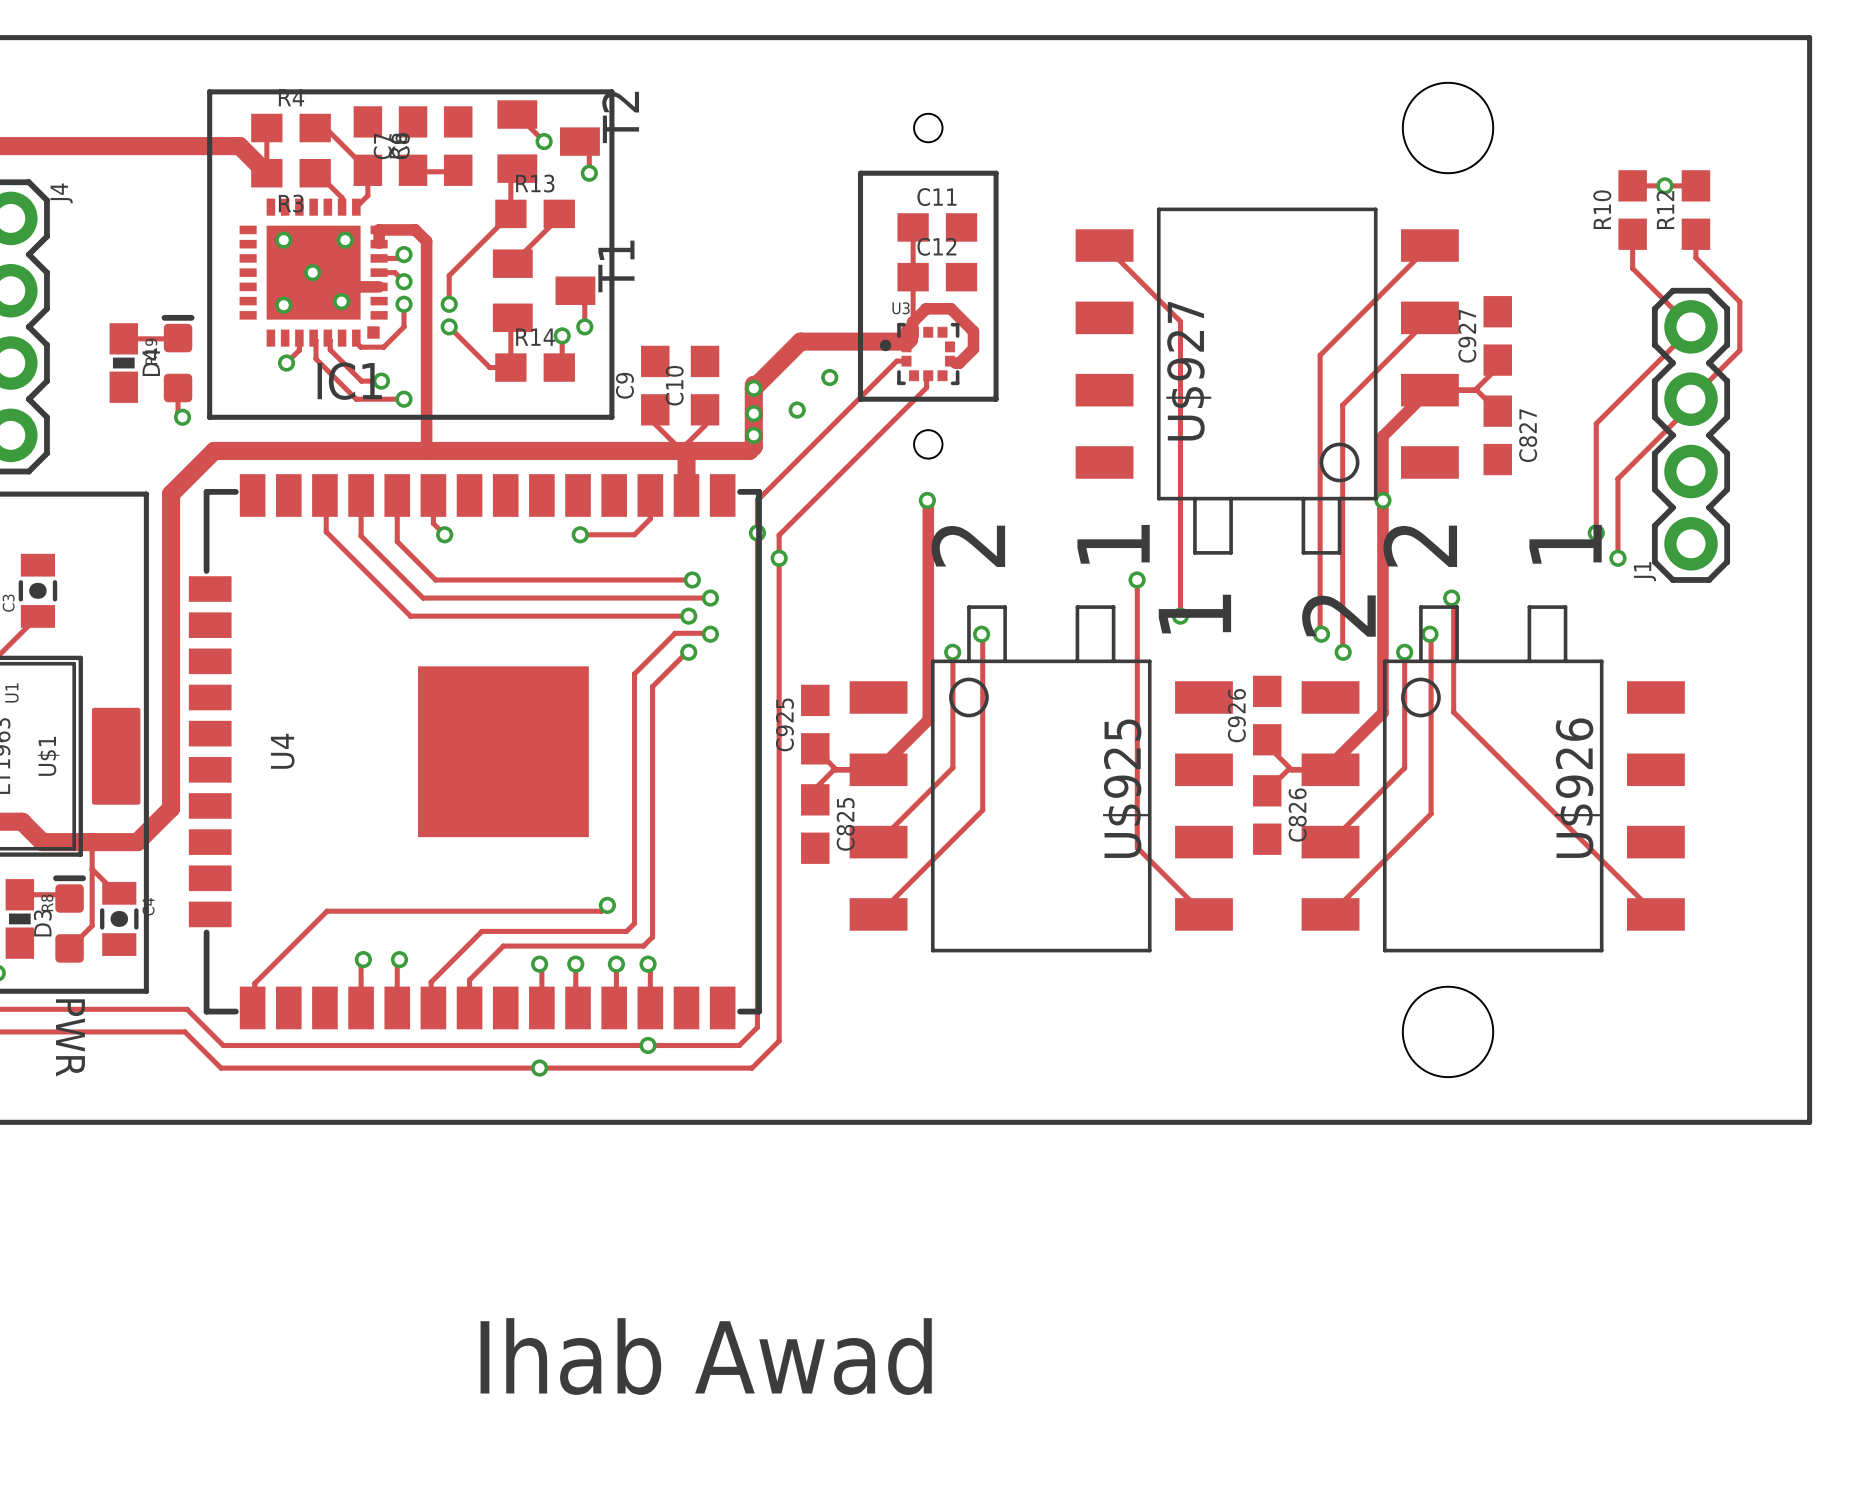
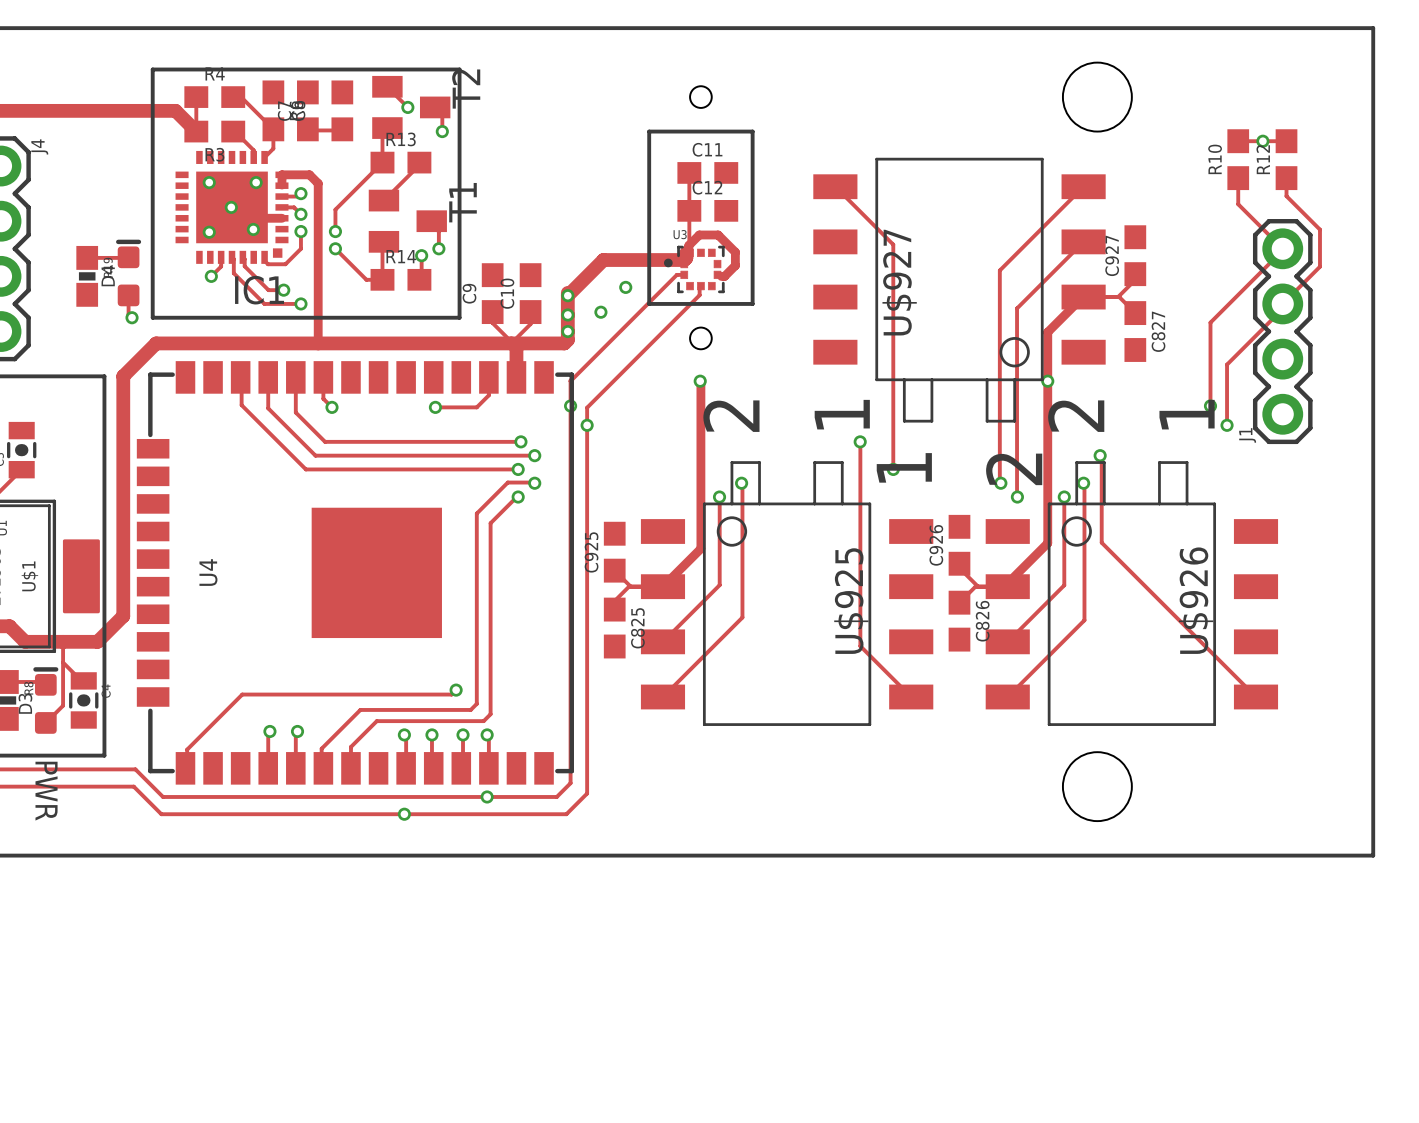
text: Ihab Awad (706, 1356) -> none

